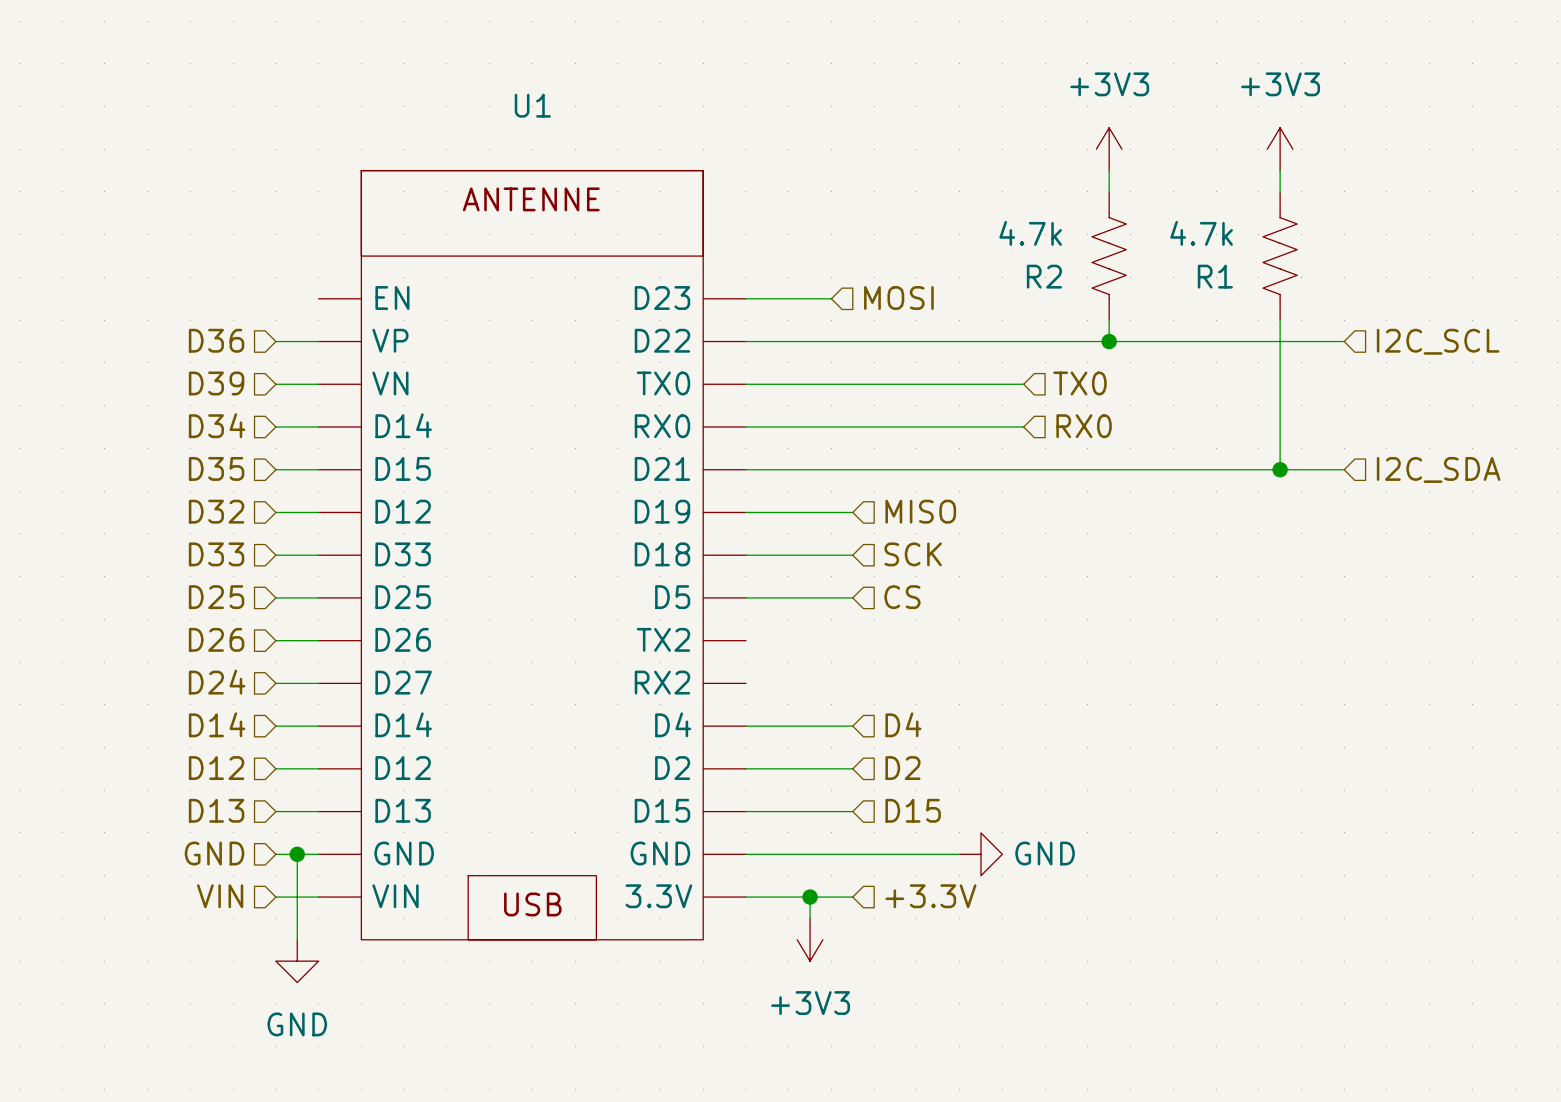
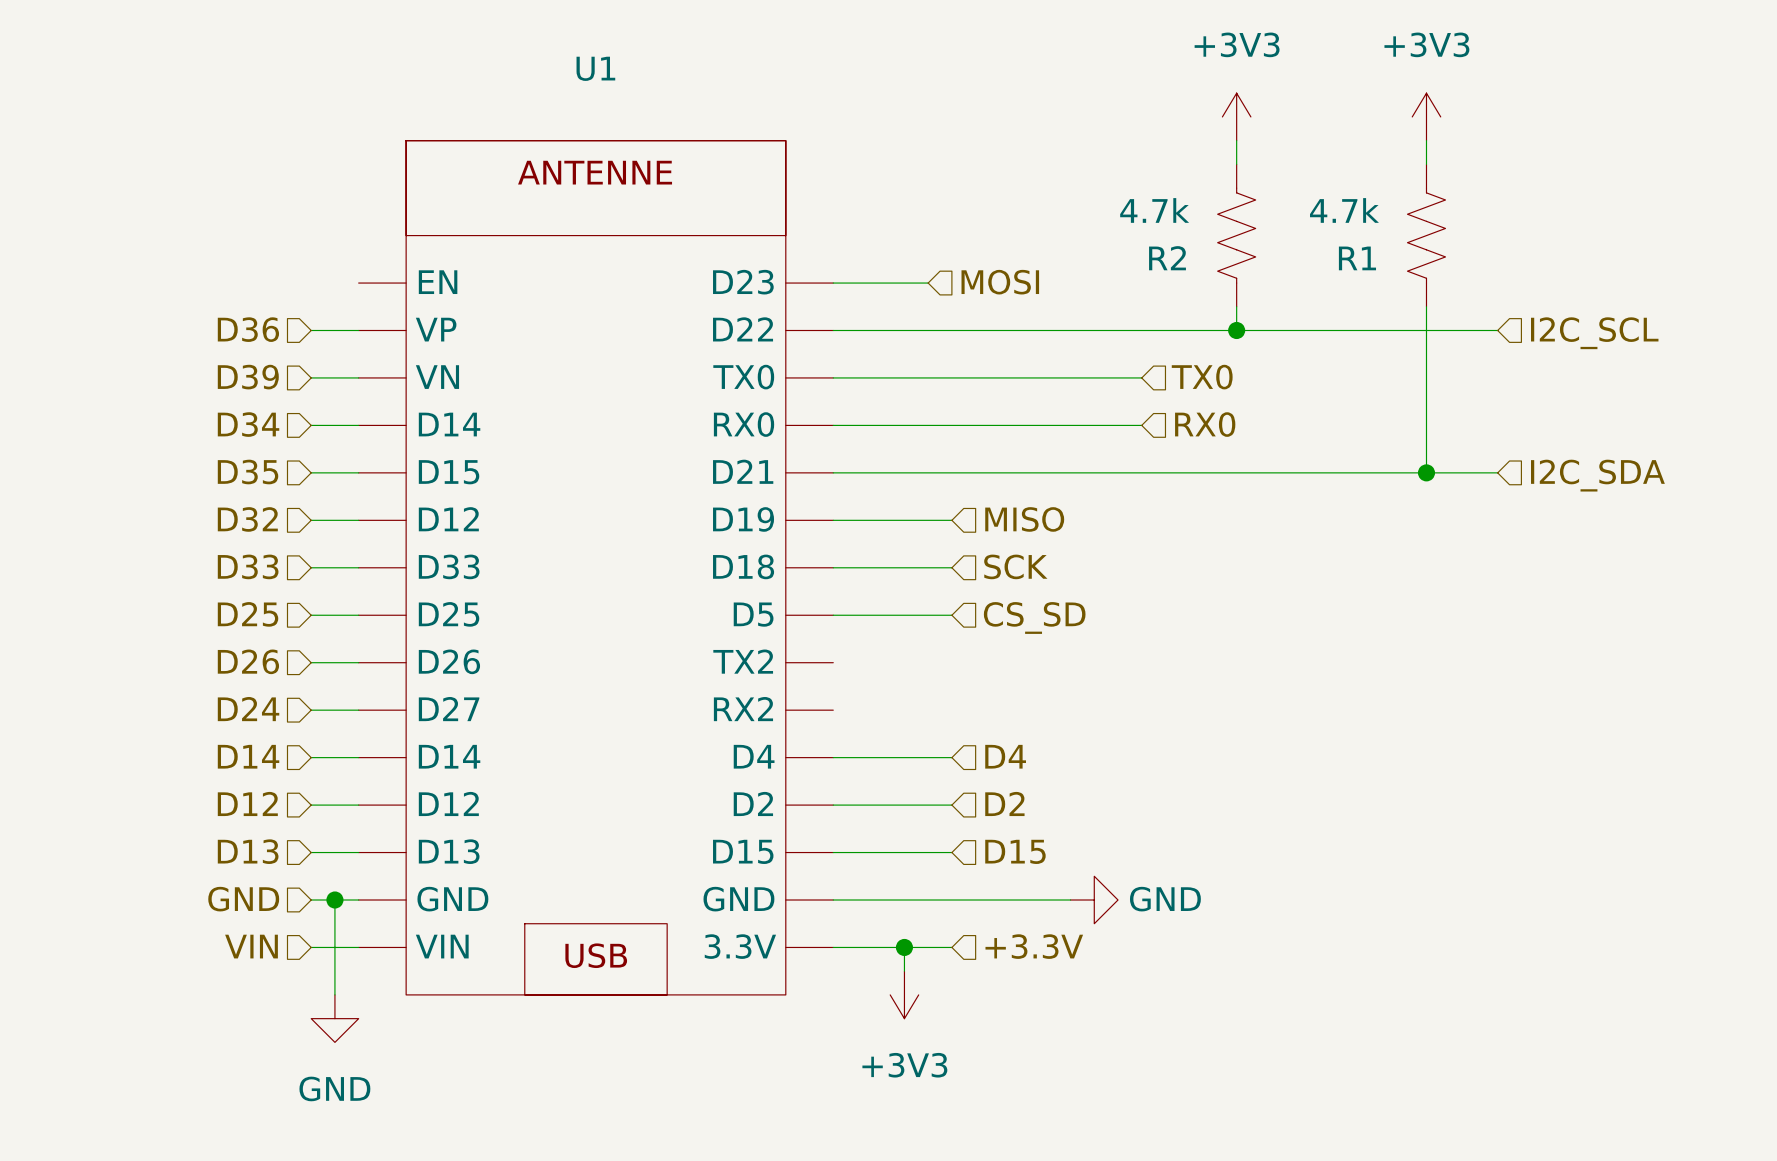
hierarchical label: CS (902, 597) -> CS_SD (1034, 617)

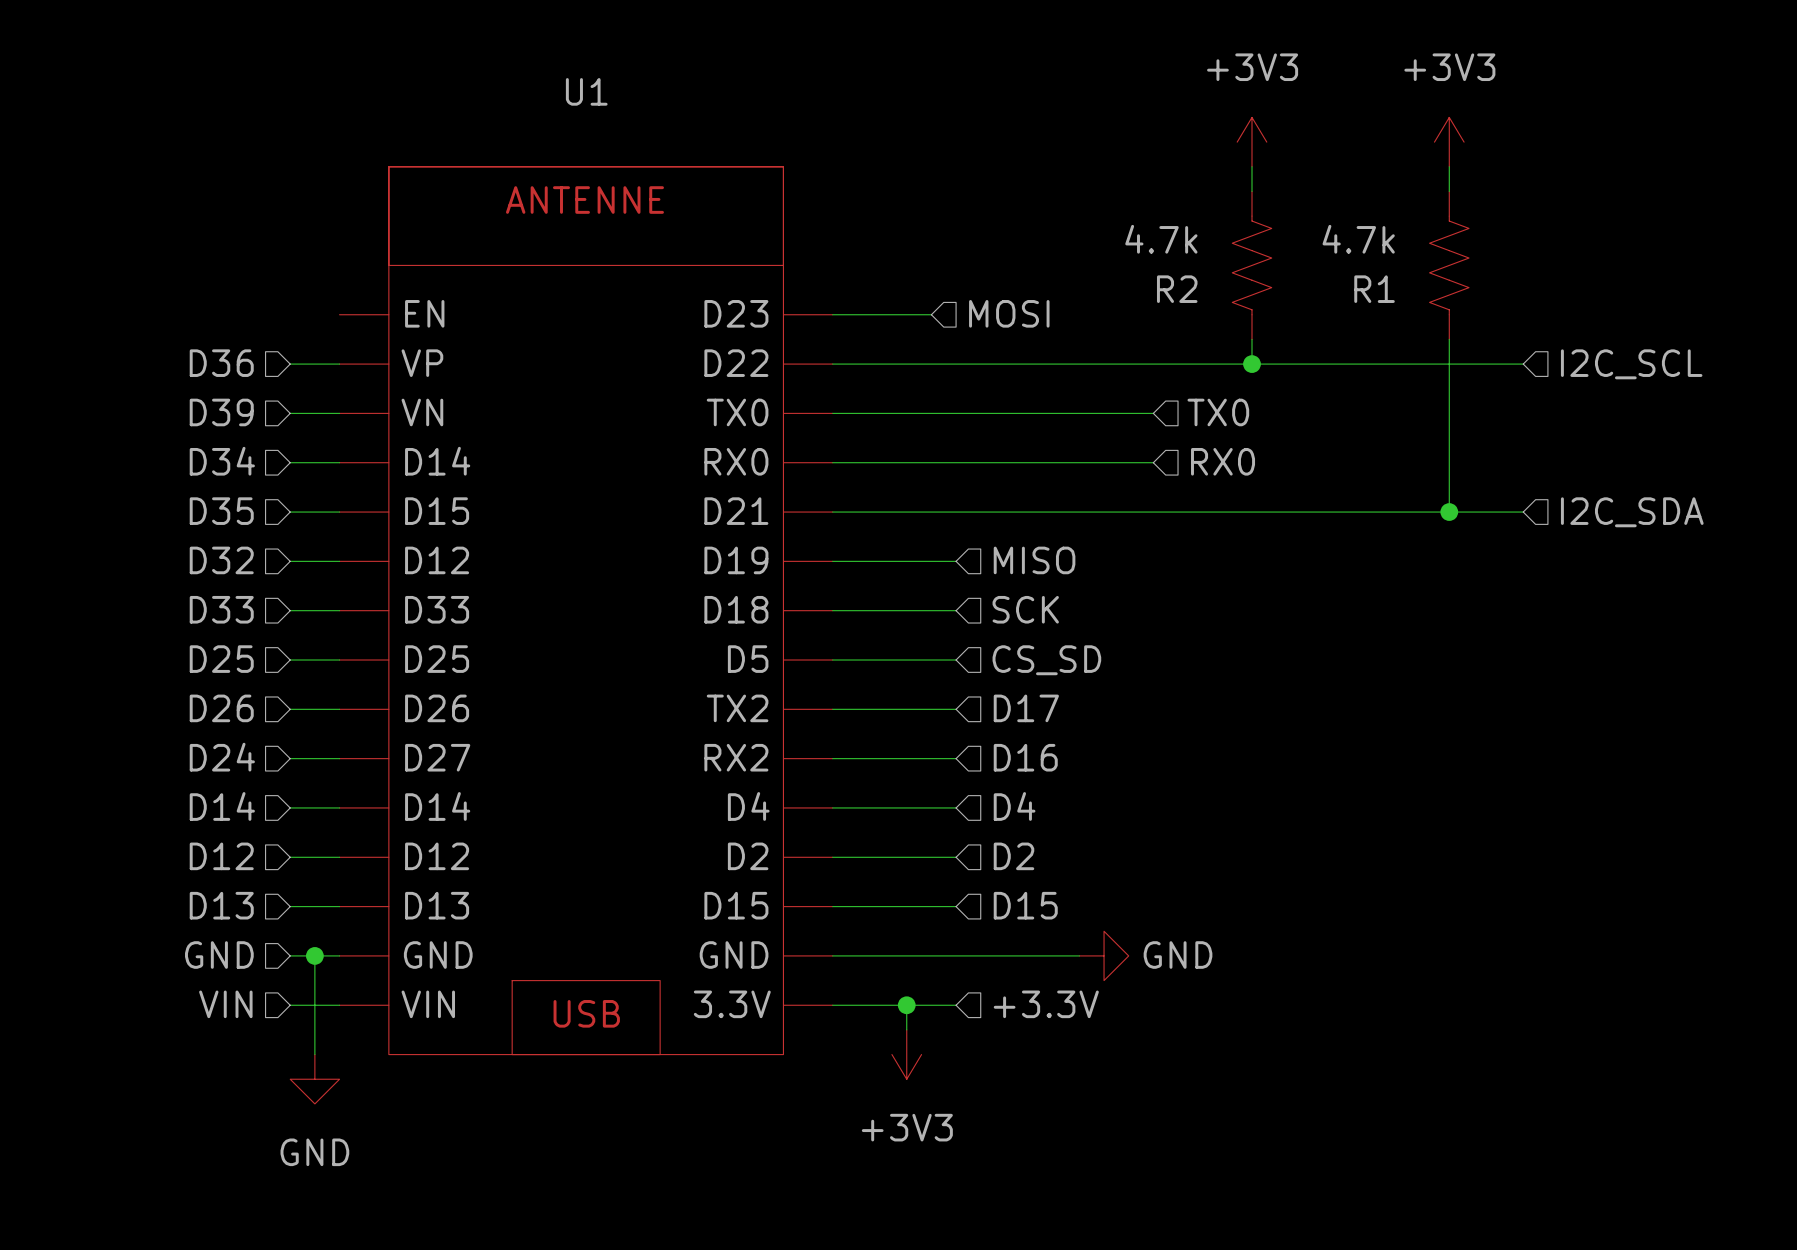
hierarchical label: none -> D17 (1026, 708)
wire: none -> (832, 709) (956, 709)
hierarchical label: none -> D16 (1025, 757)
wire: none -> (832, 758) (956, 758)

